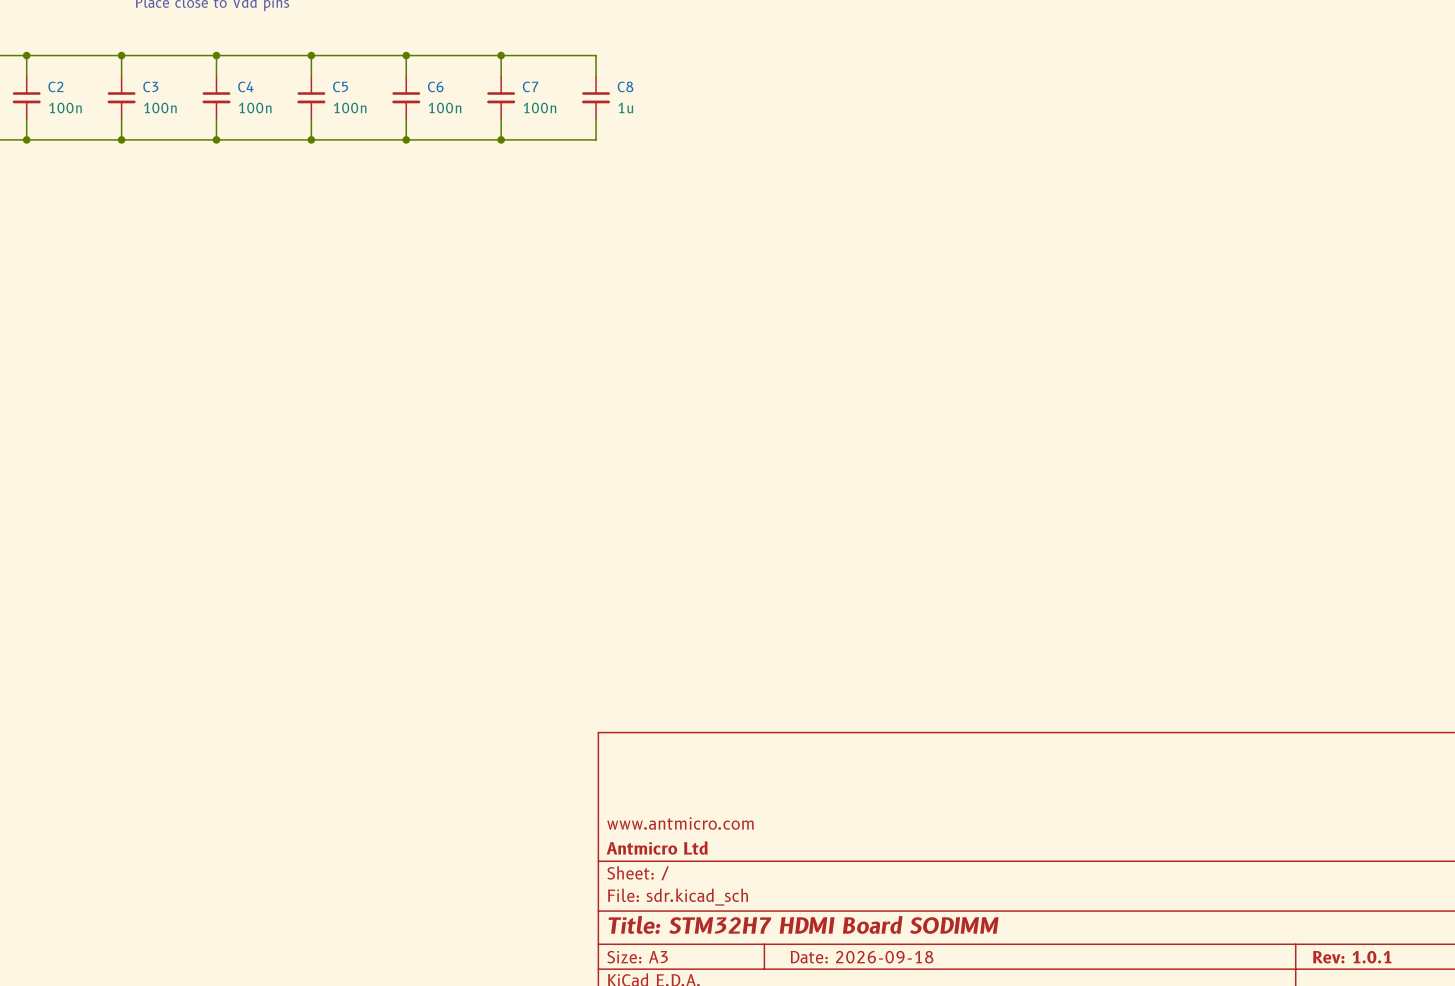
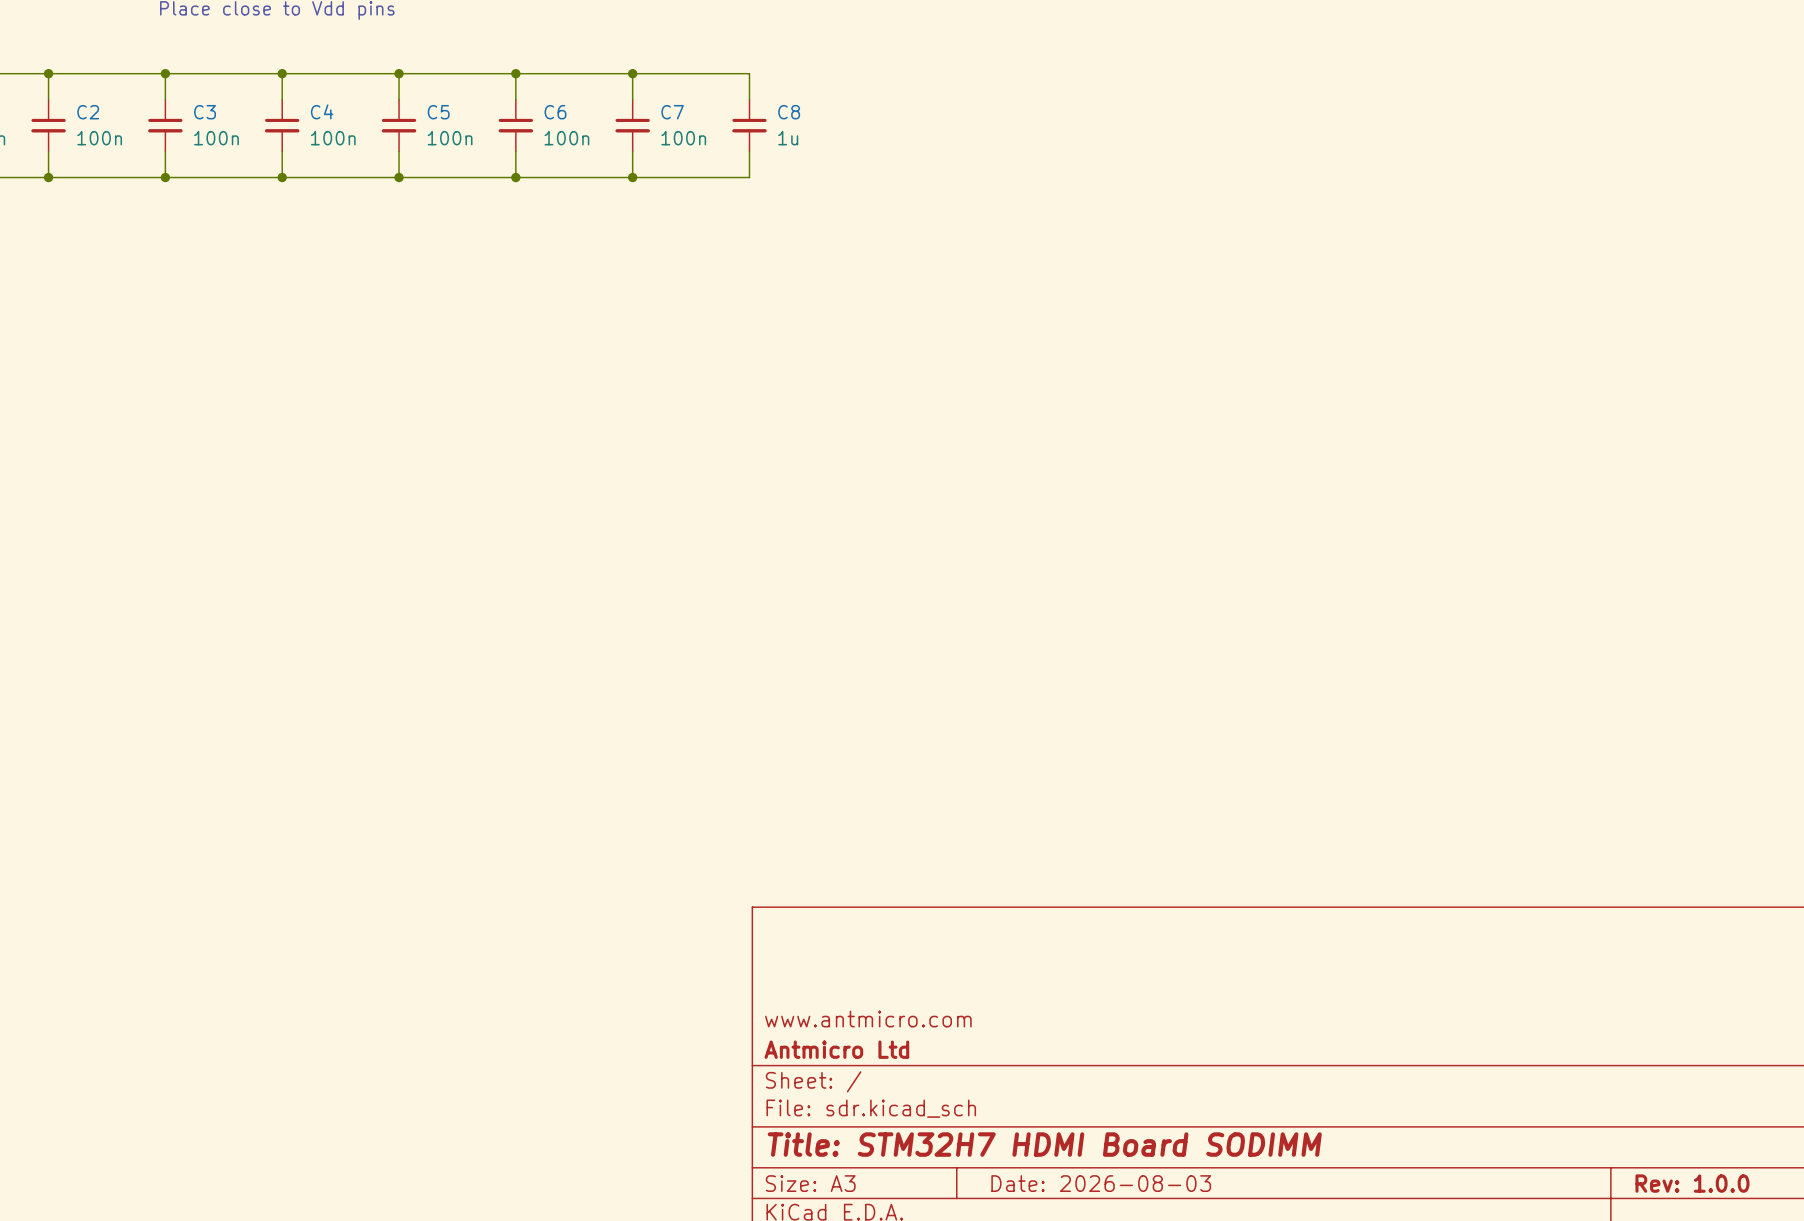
title block: Date: 2026-09-18 (862, 957) -> Date: 2026-08-03 (1101, 1183)
title block: Rev: 1.0.1 (1352, 957) -> Rev: 1.0.0 (1692, 1183)

